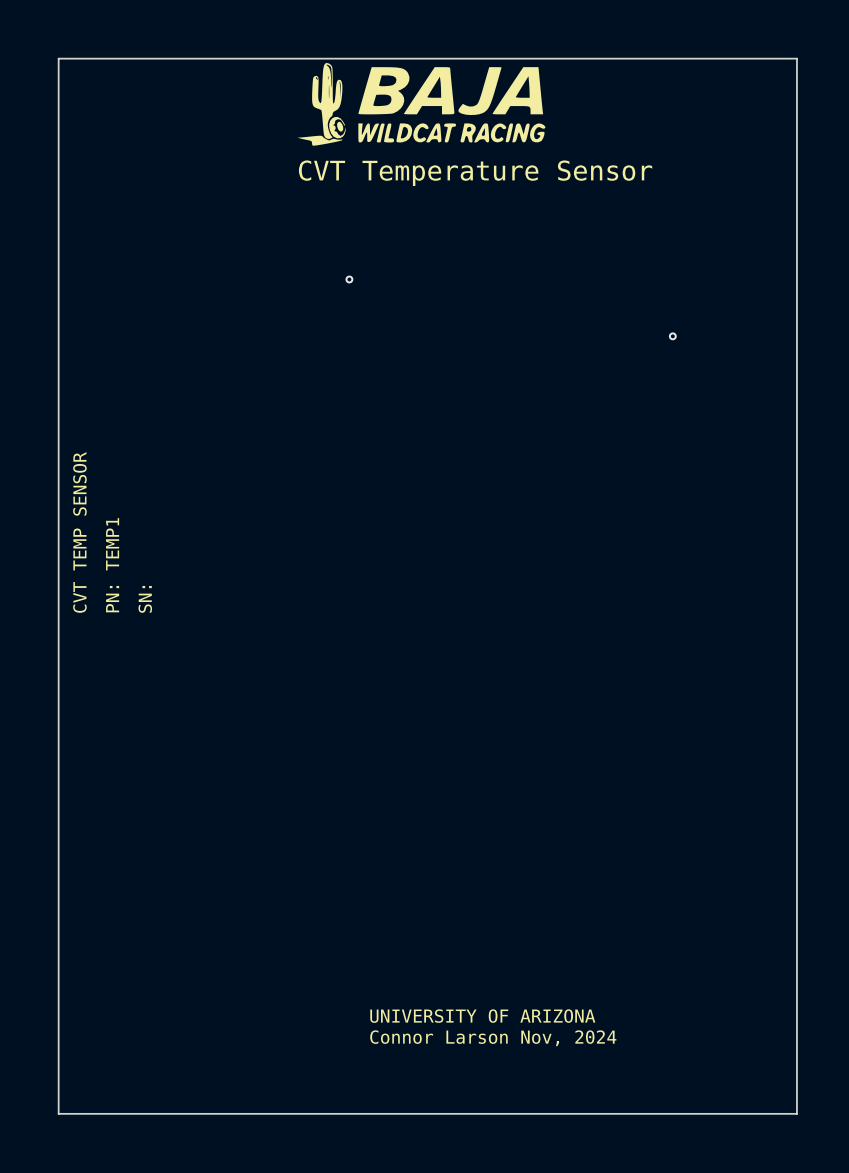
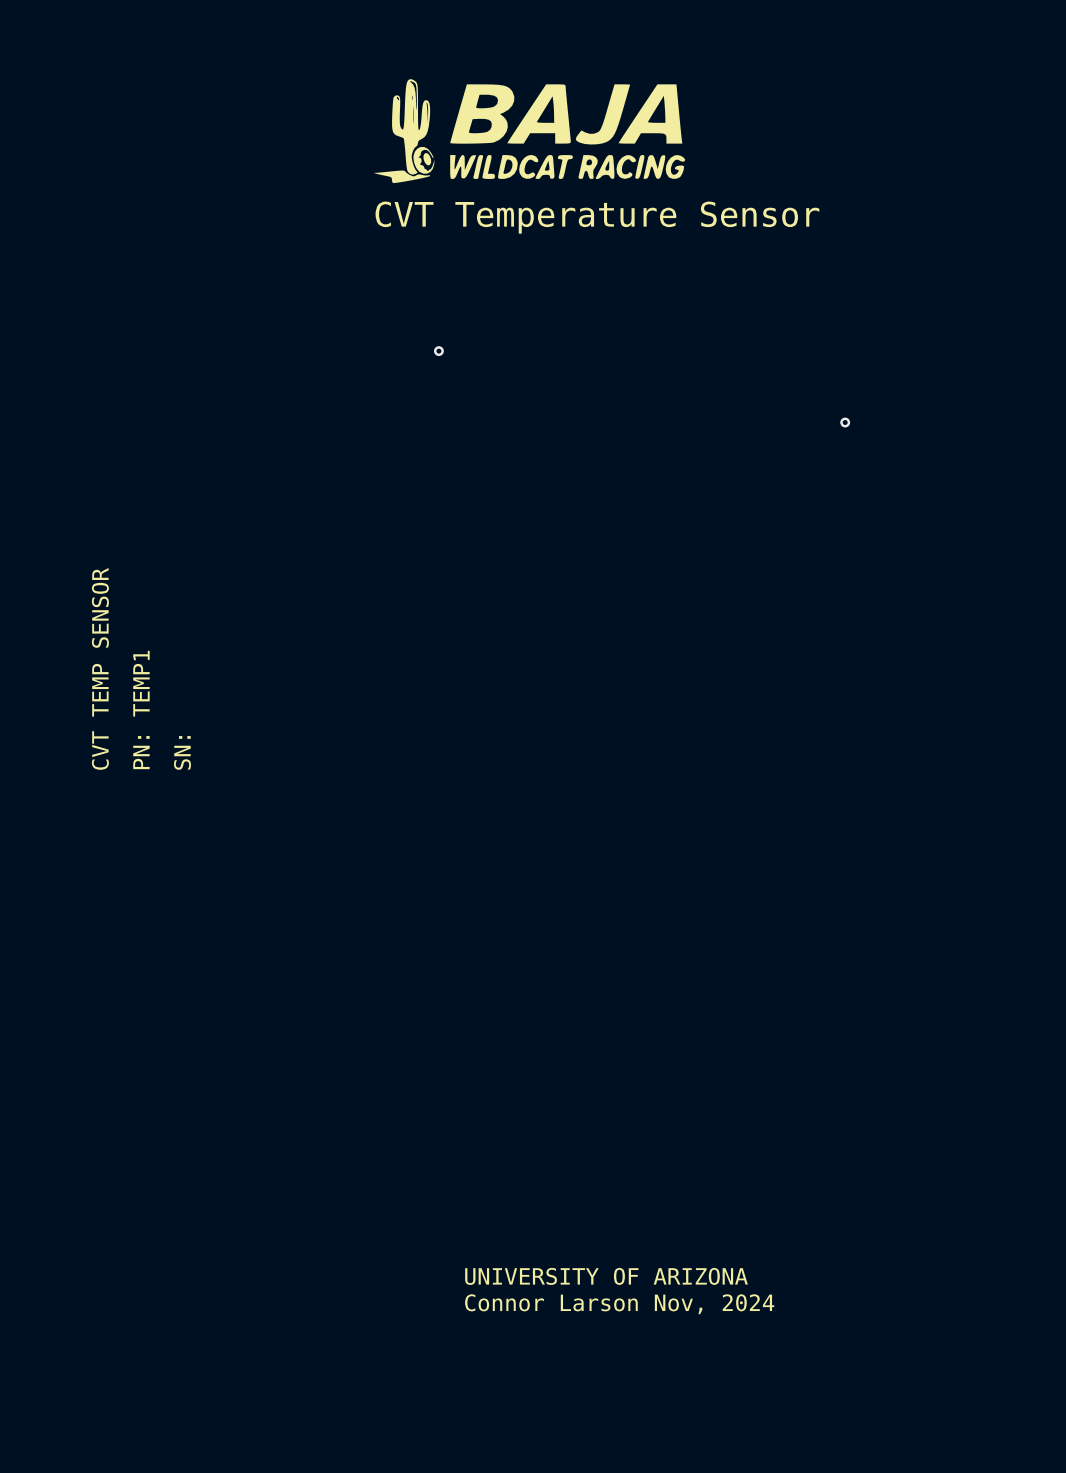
board edge: (58, 58) (796, 58) (796, 1113) (58, 1113) (58, 58) -> none

